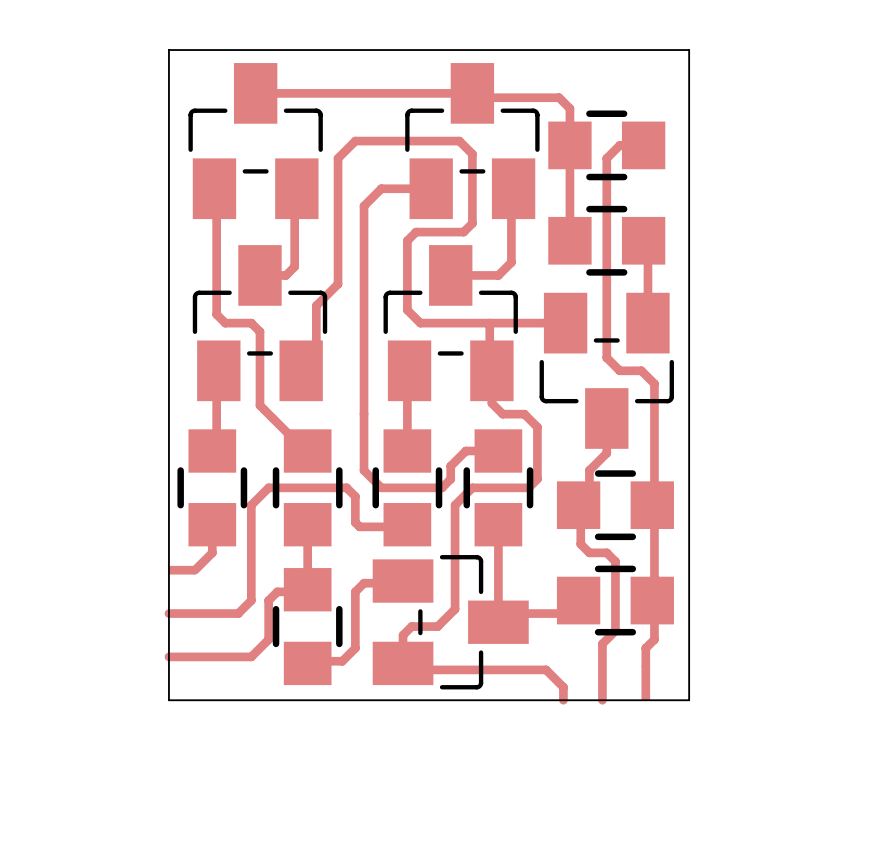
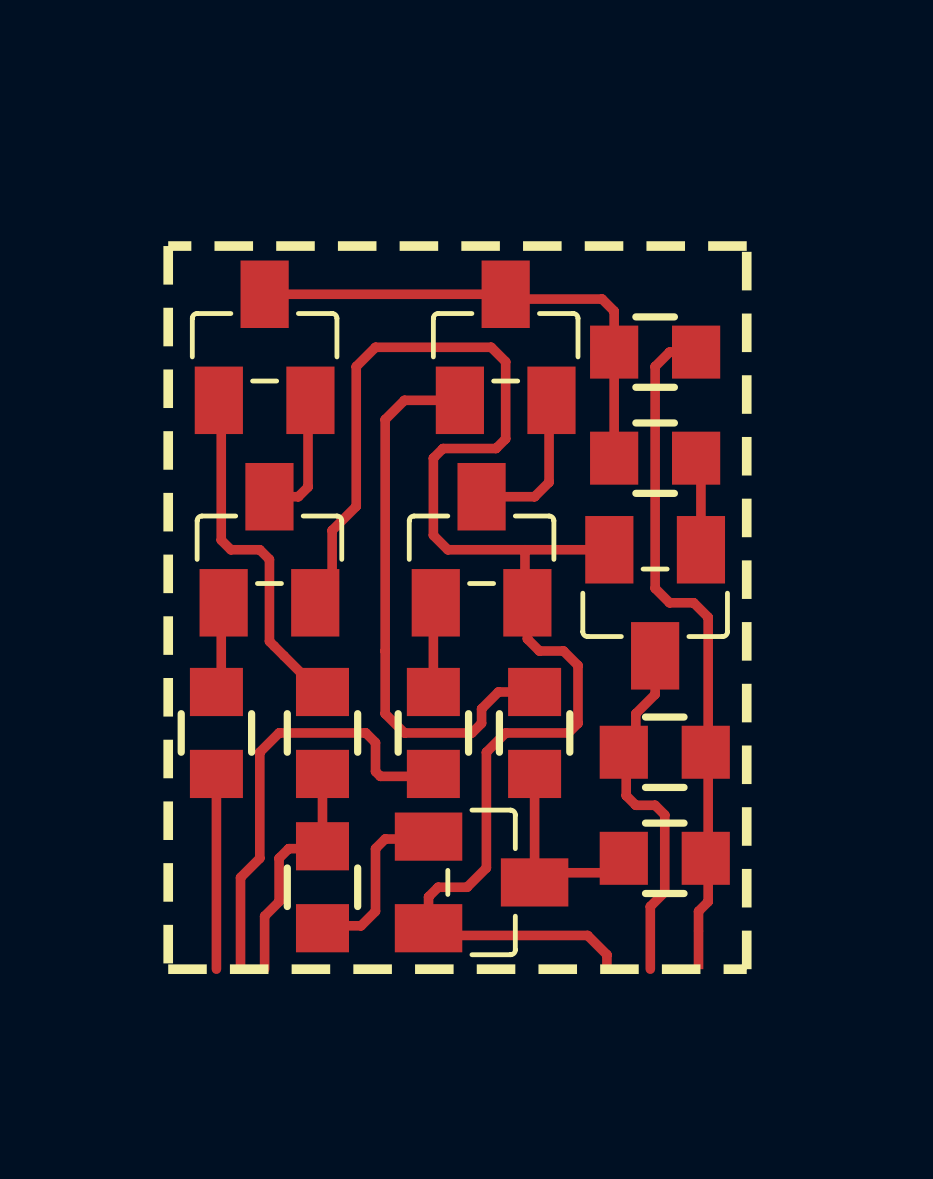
board edge: (168, 50) (168, 700) (689, 700) (689, 50) (168, 50) -> none
line: none -> (168, 246) (746, 246) (746, 969) (168, 969) (168, 246)
top track: (212, 552) (194, 570) (168, 570) -> (216, 805) (216, 969)
top track: (168, 613) (238, 613) -> (240, 969) (240, 877) (245, 872)
top track: (255, 652) (251, 656) (168, 656) -> (264, 916) (264, 969)

